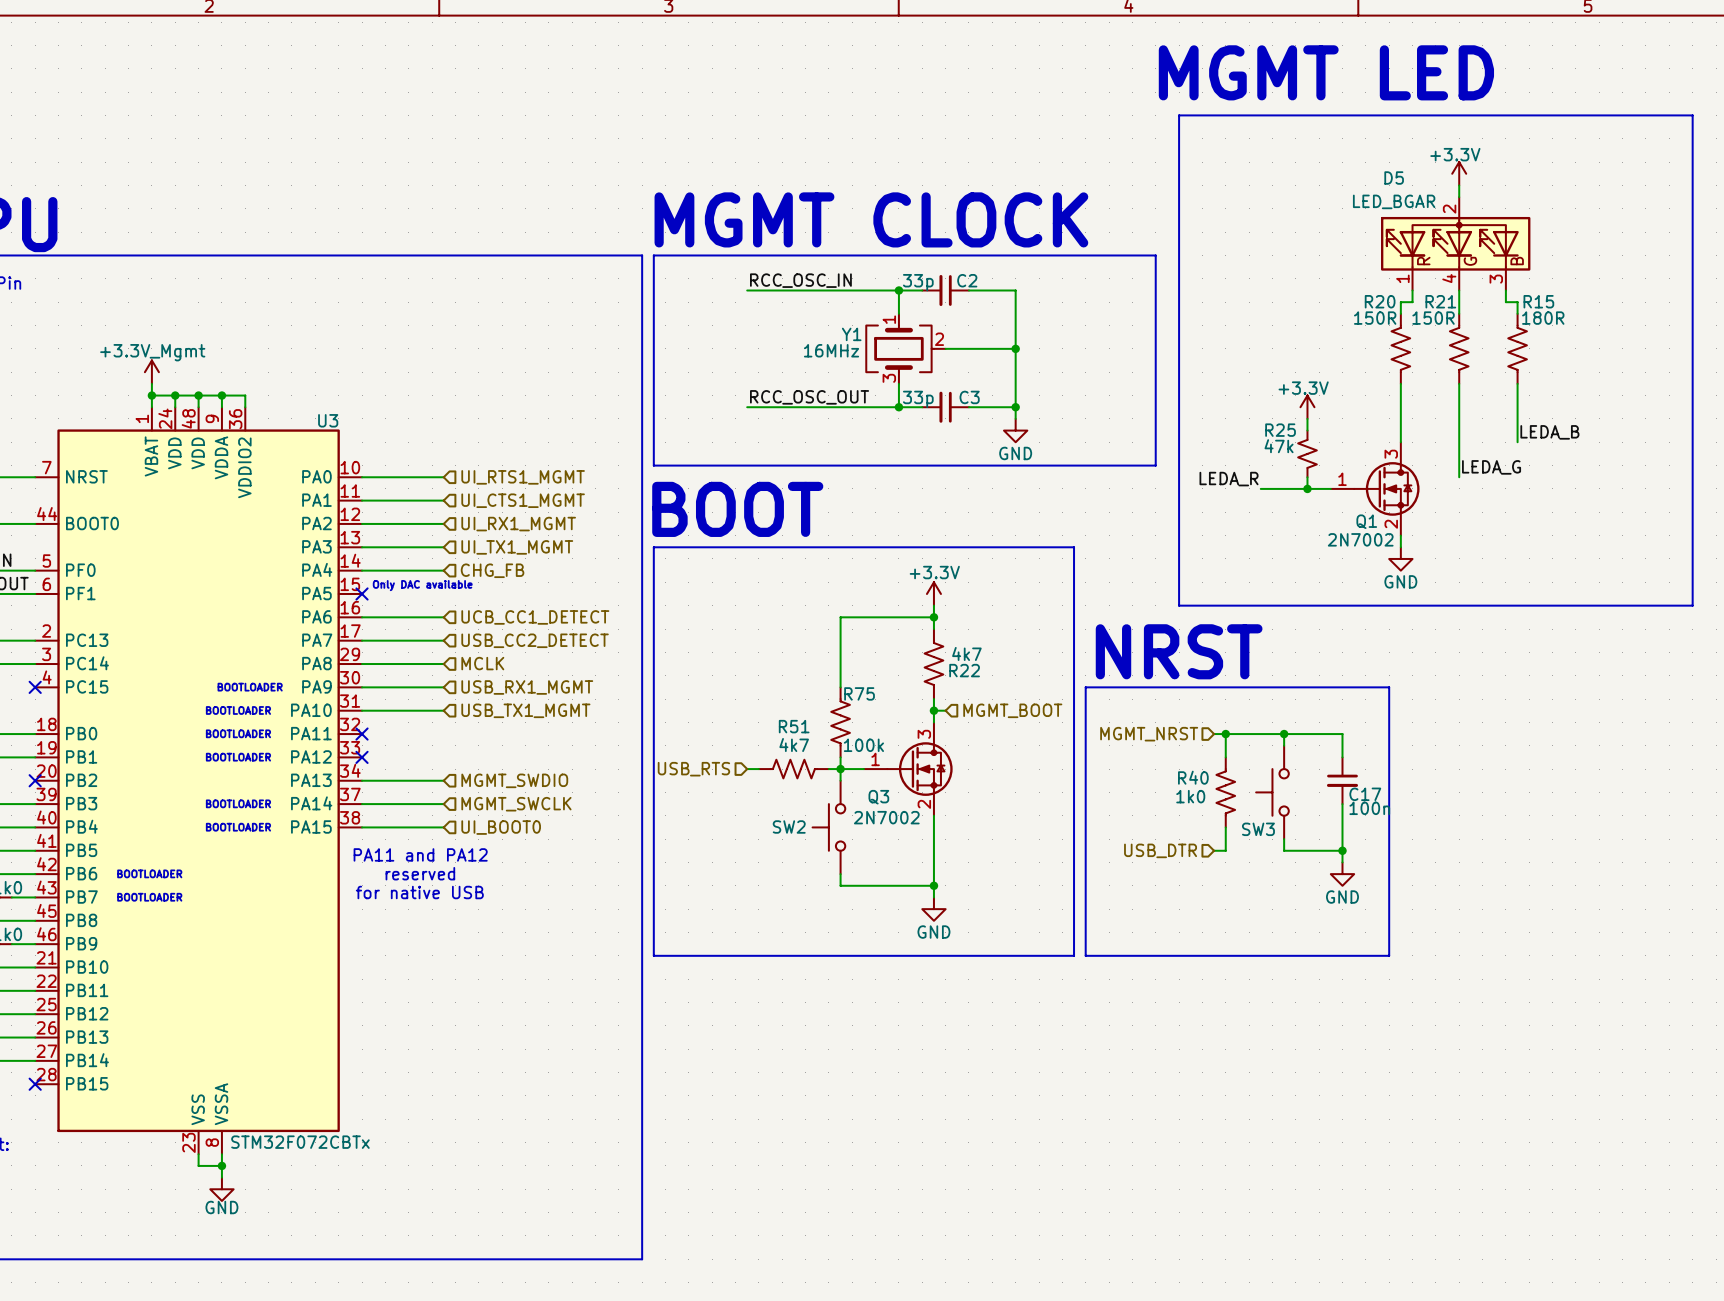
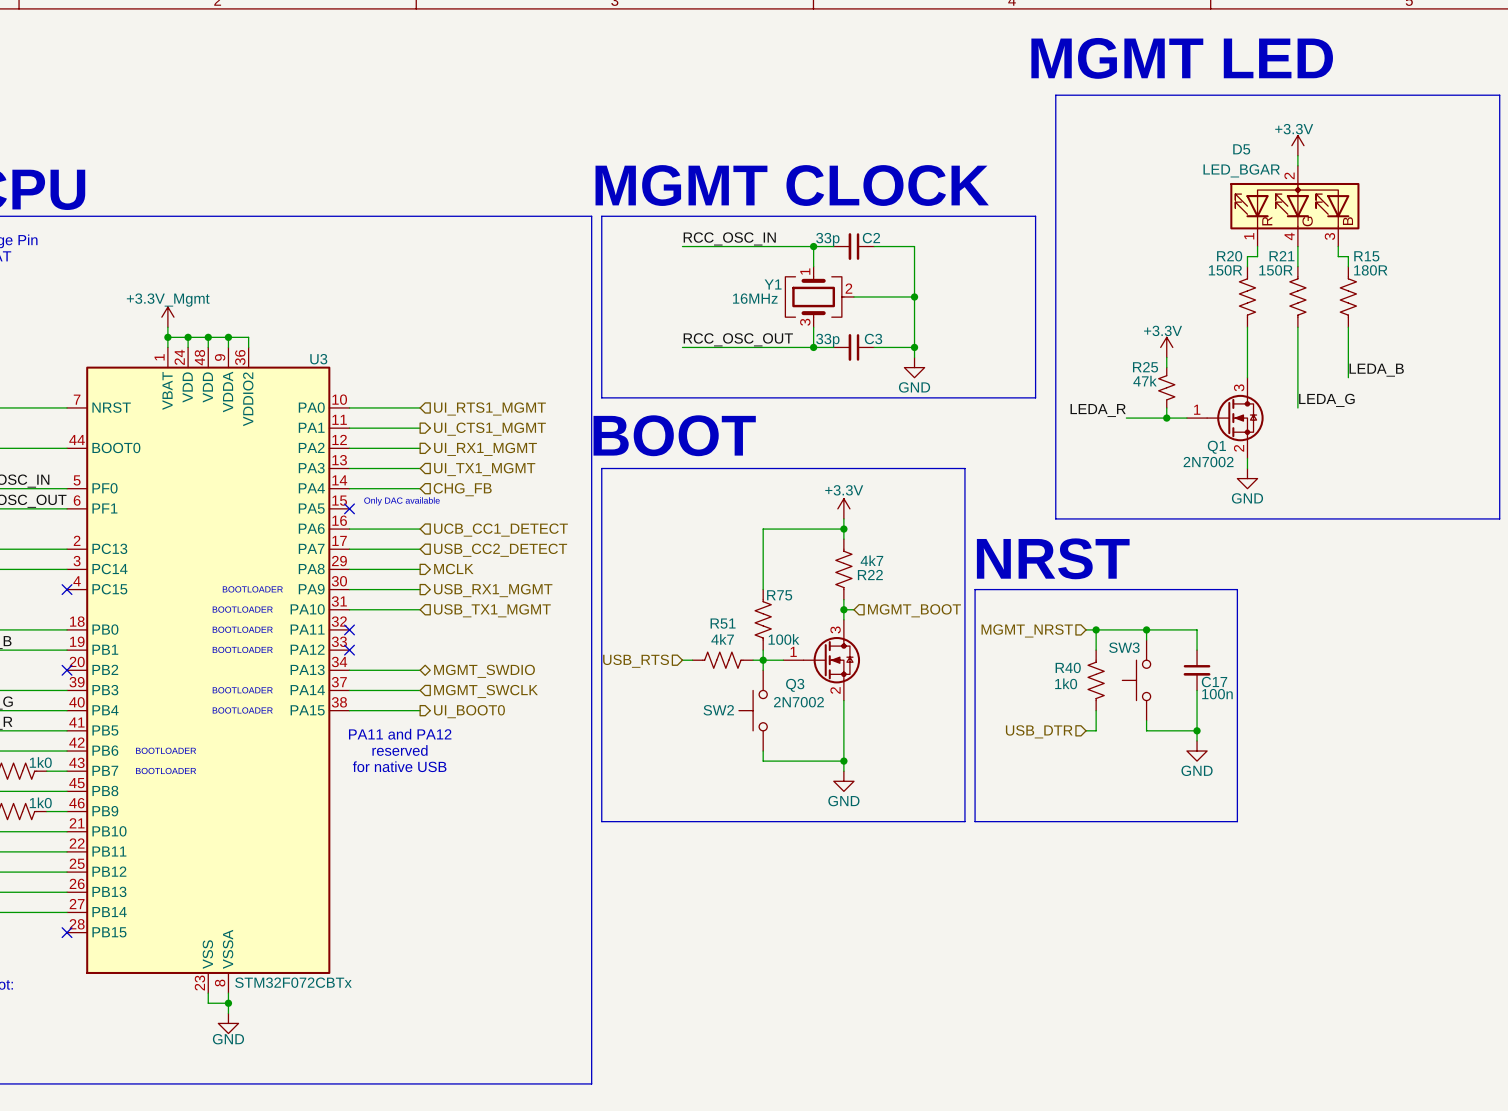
hierarchical label shape: input (523, 500) -> output (489, 429)
hierarchical label shape: input (518, 524) -> output (485, 449)
hierarchical label shape: input (482, 663) -> output (453, 569)
hierarchical label shape: input (527, 687) -> output (493, 590)
hierarchical label shape: input (514, 780) -> bidirectional (484, 671)
hierarchical label shape: input (501, 827) -> output (469, 711)
SW3 name position: SW3 (1258, 829) -> SW3 (1124, 647)

